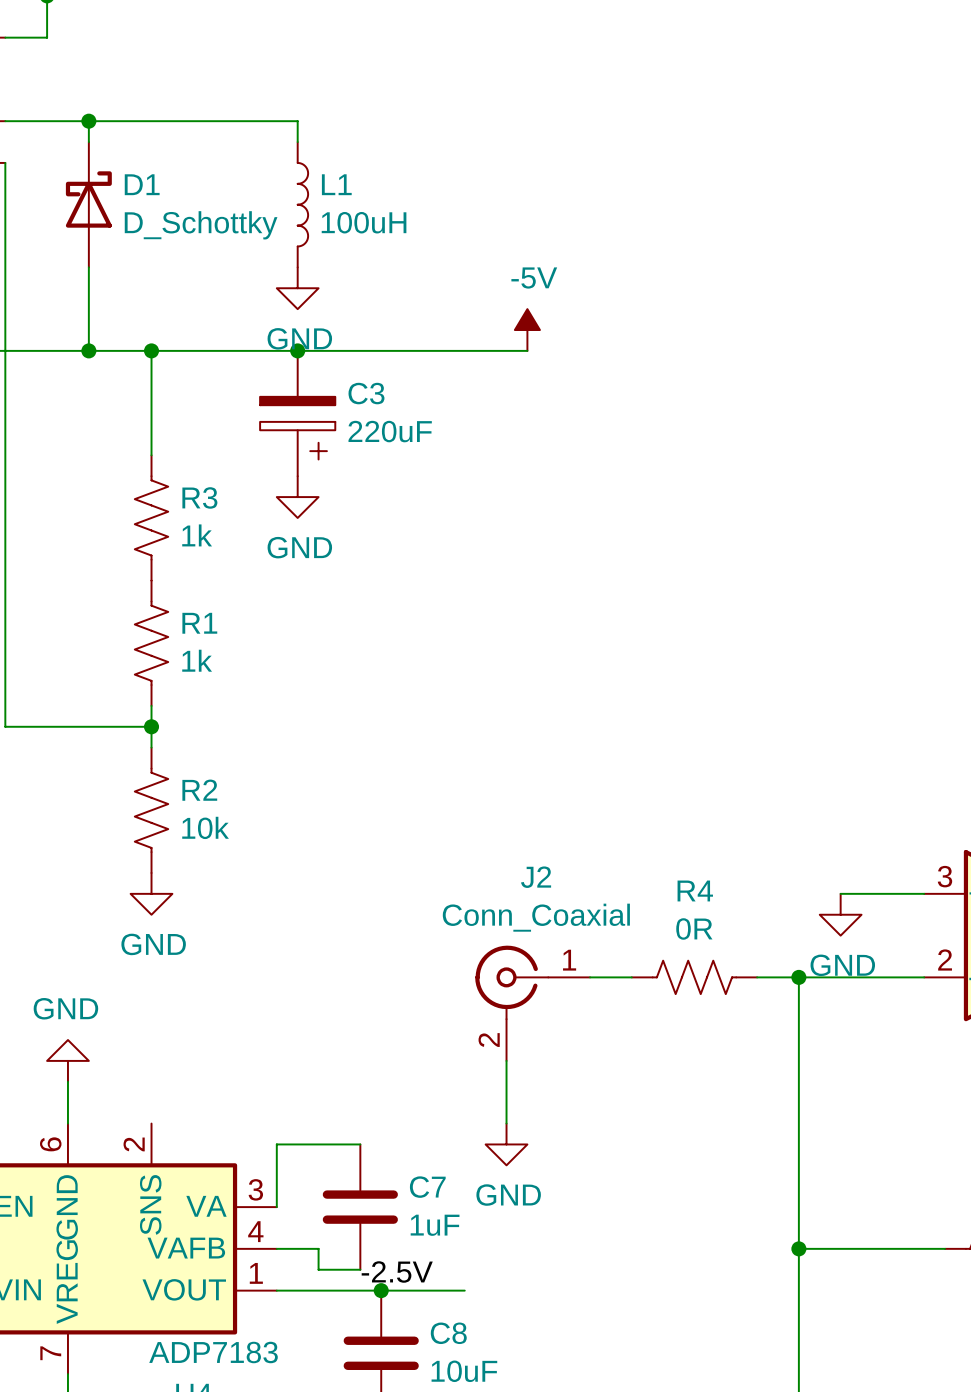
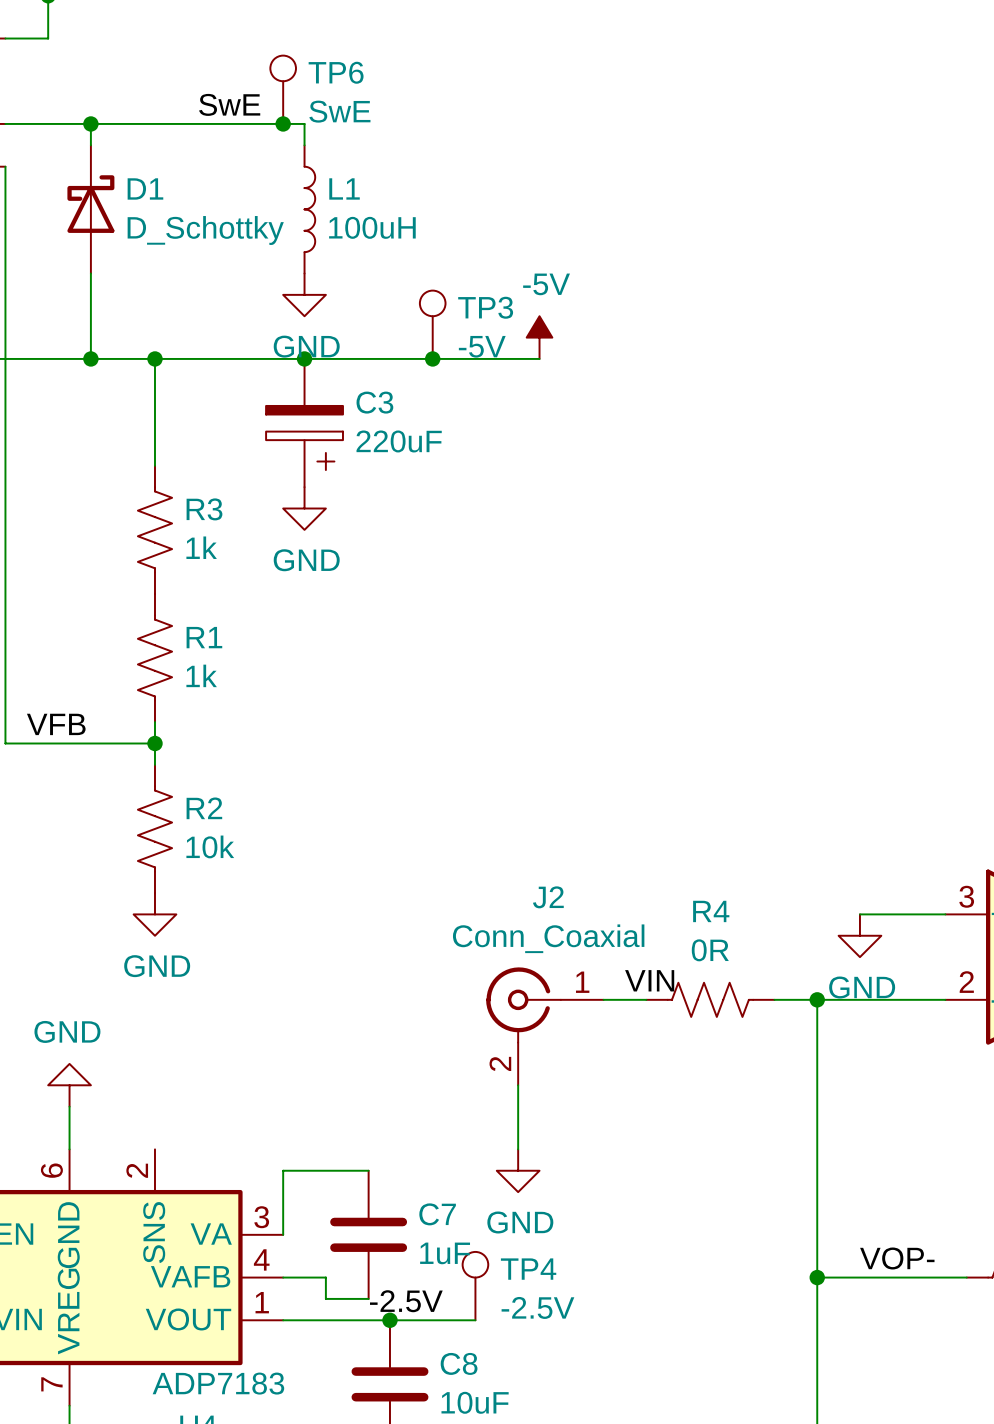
TP6: none -> SwE (283, 89)
label: none -> SwE (229, 104)
junction: none -> (283, 123)
TP3: none -> -5V (432, 324)
junction: none -> (432, 358)
label: none -> VFB (56, 724)
label: none -> VIN (649, 980)
label: none -> VOP- (897, 1258)
TP4: none -> -2.5V (475, 1286)

